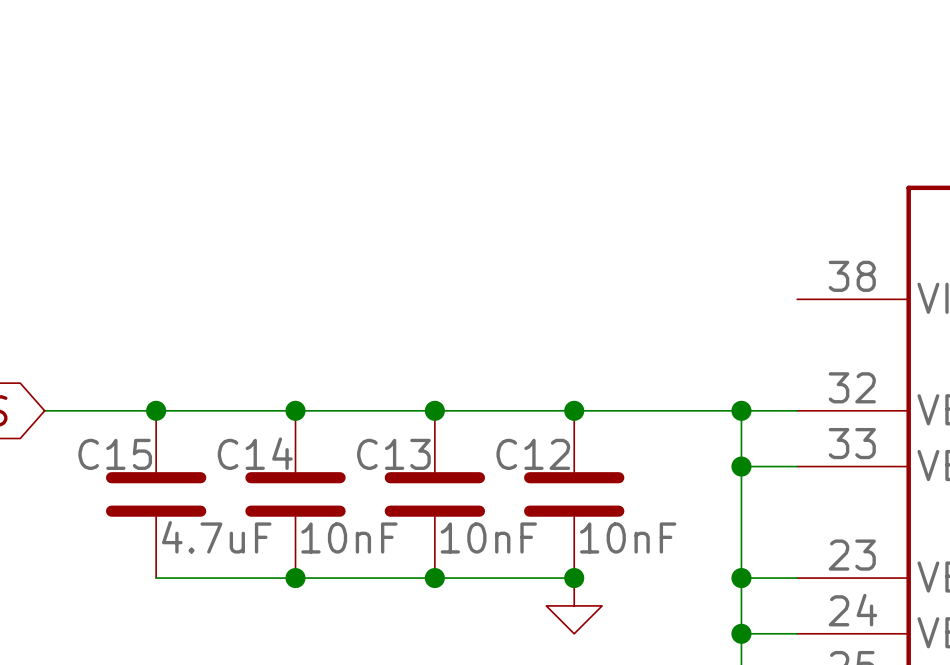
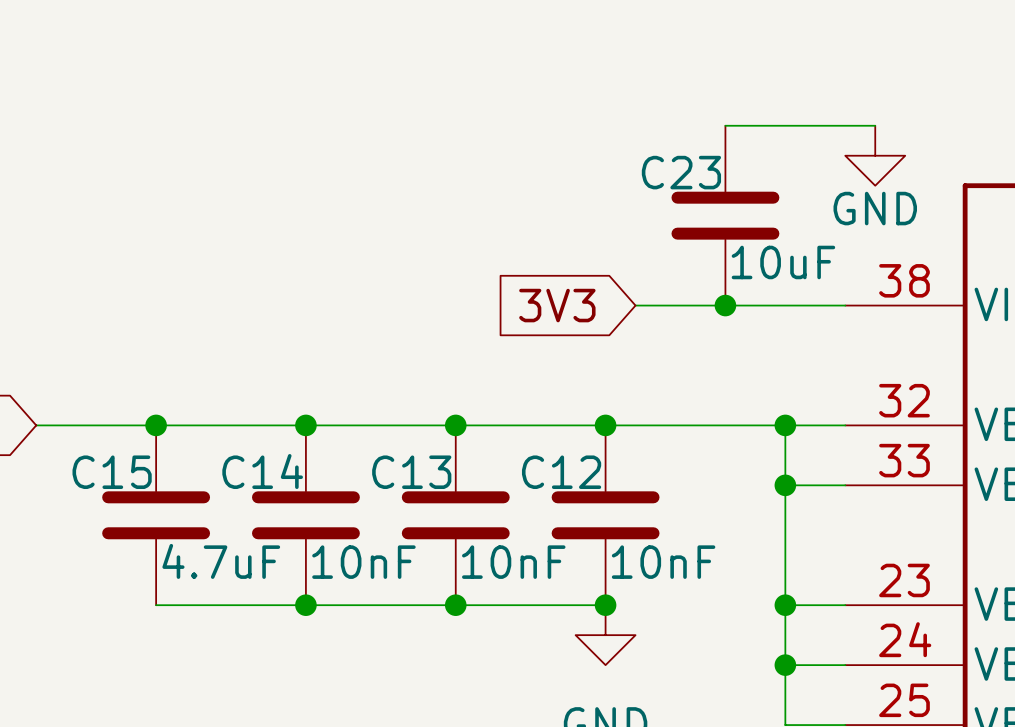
wire: none -> (725, 125) (875, 125)
power symbol: none -> GND (875, 155)
C23: none -> 10uF (725, 215)
global label: none -> 3V3 (557, 305)
wire: none -> (635, 305) (845, 305)
junction: none -> (725, 305)

